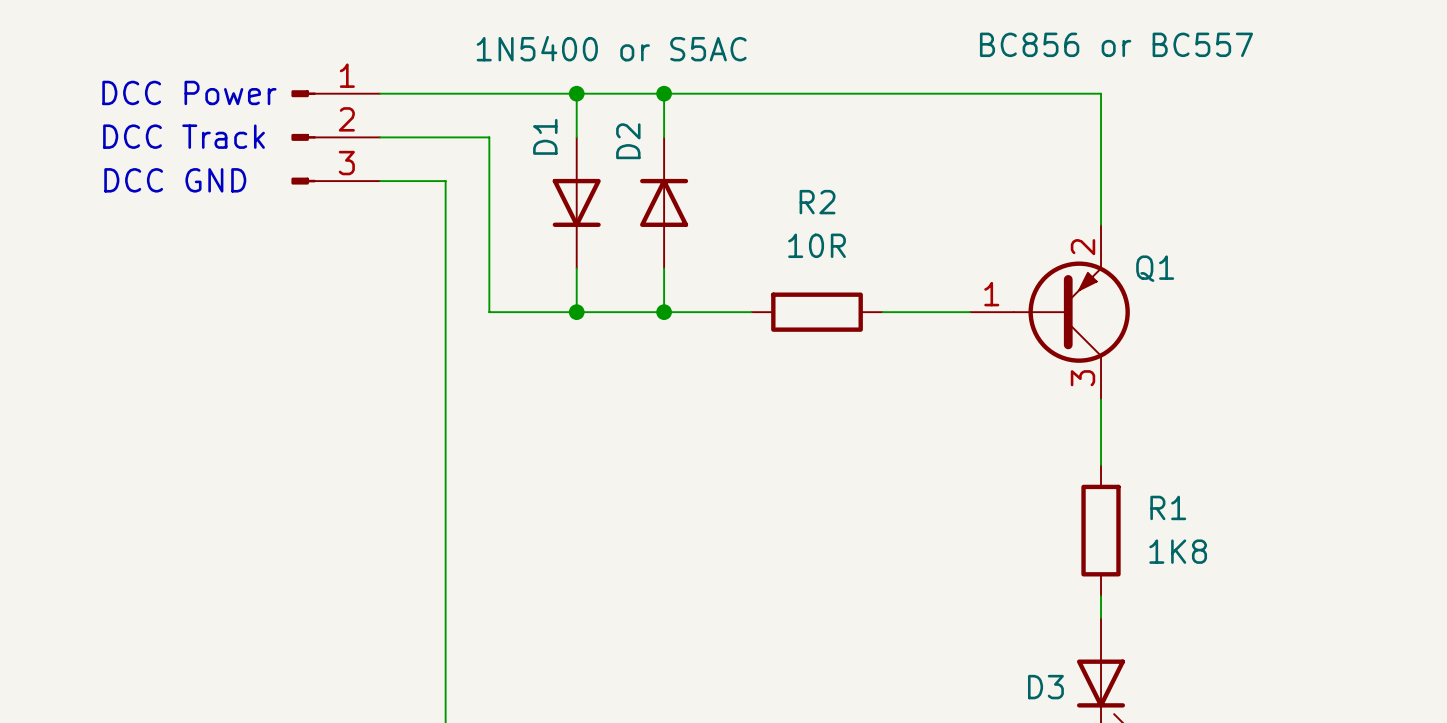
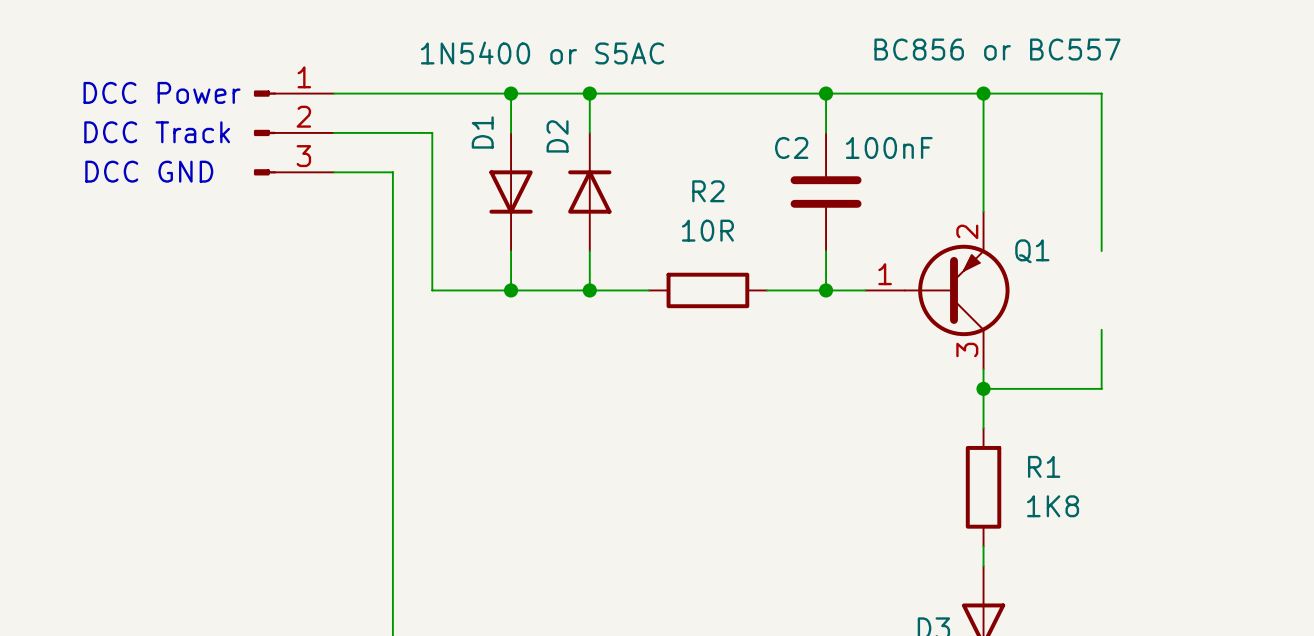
wire: none -> (826, 93) (826, 132)
junction: none -> (826, 93)
wire: none -> (983, 93) (1101, 93) (1101, 251)
junction: none -> (983, 93)
C2: none -> 100nF (826, 192)
wire: none -> (826, 251) (826, 290)
R2 position: (817, 312) -> (707, 290)
junction: none -> (826, 290)
wire: none -> (1101, 329) (1101, 388) (983, 388)
junction: none -> (983, 388)

